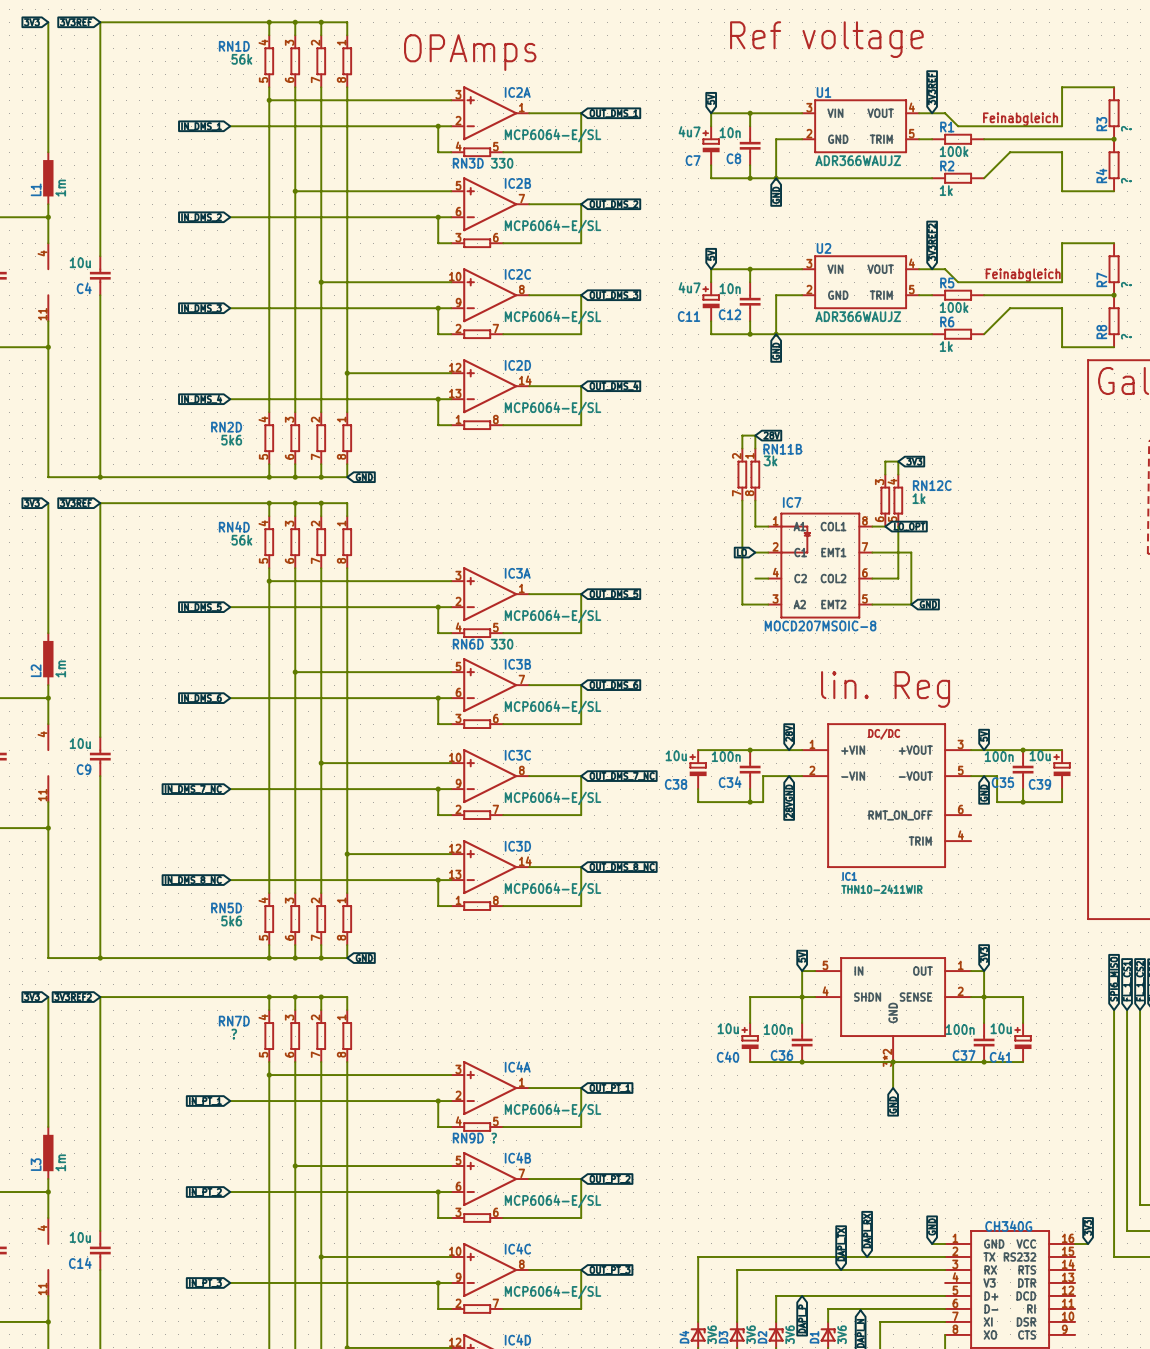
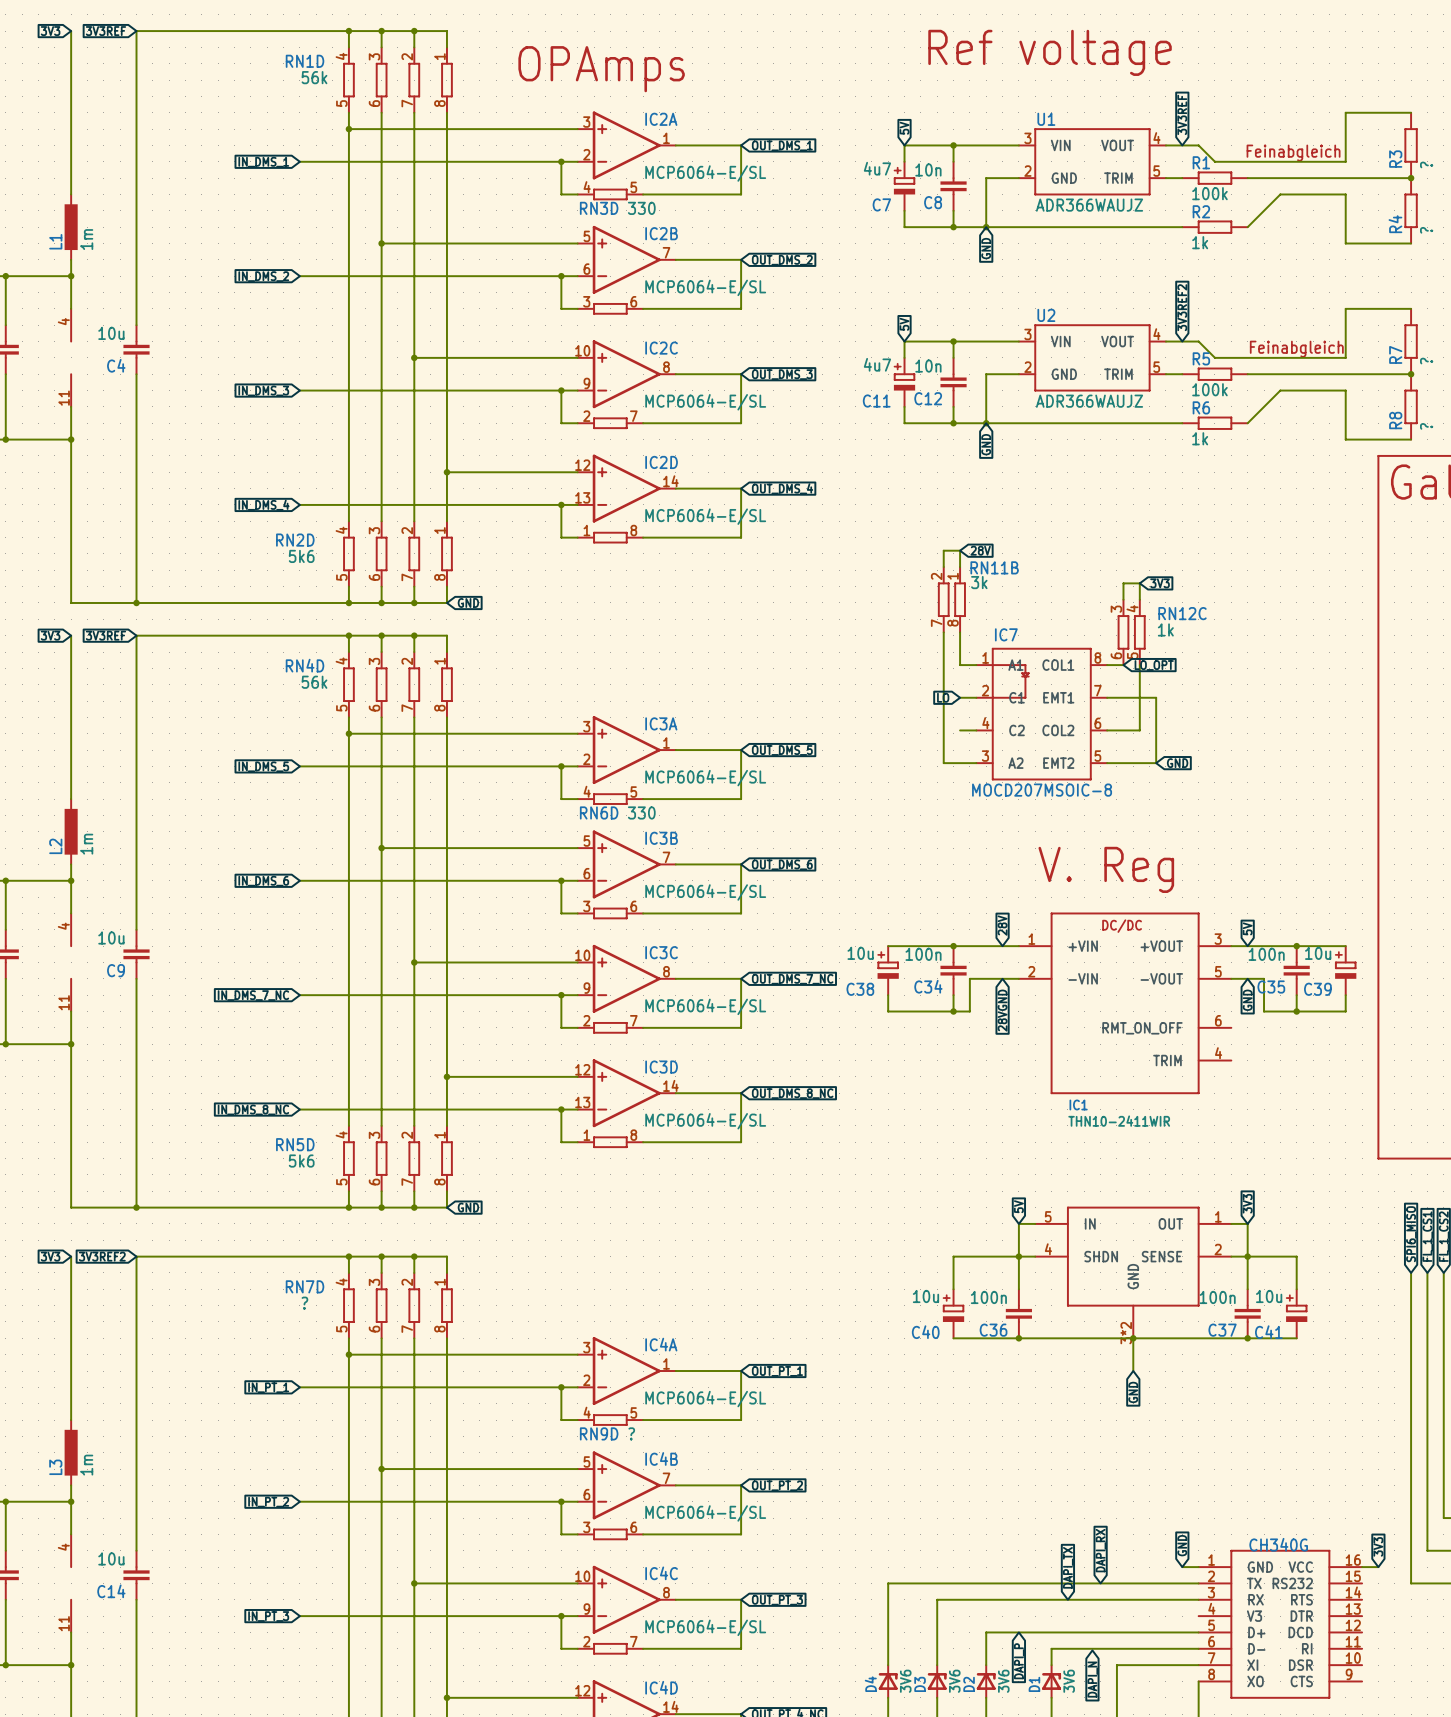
text: lin. Reg (885, 689) -> V. Reg (1106, 869)

